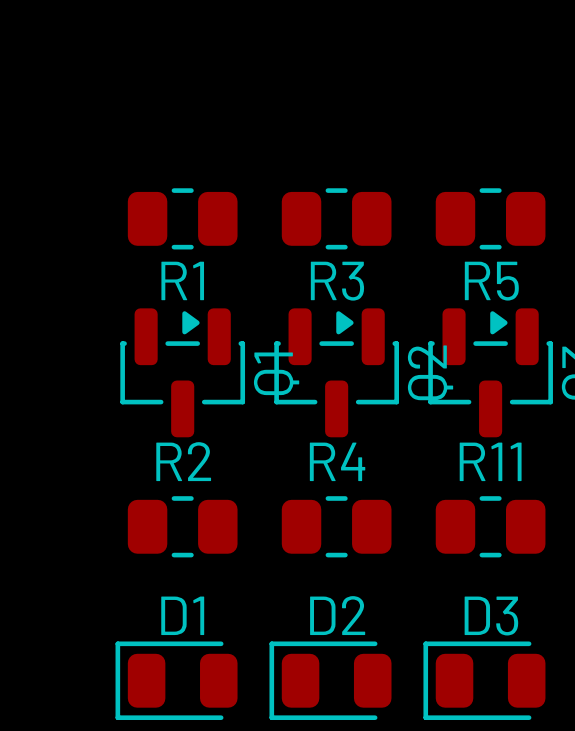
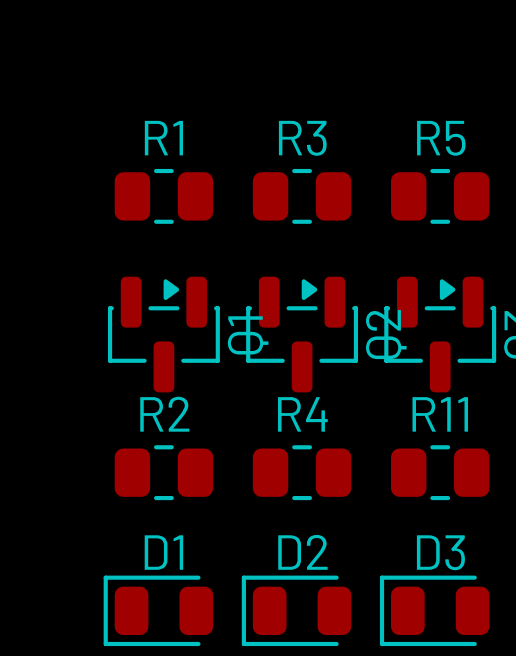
R1 name position: R1 (182, 280) -> R1 (163, 138)
R3 name position: R3 (337, 281) -> R3 (302, 138)
R5 name position: R5 (491, 281) -> R5 (441, 138)

